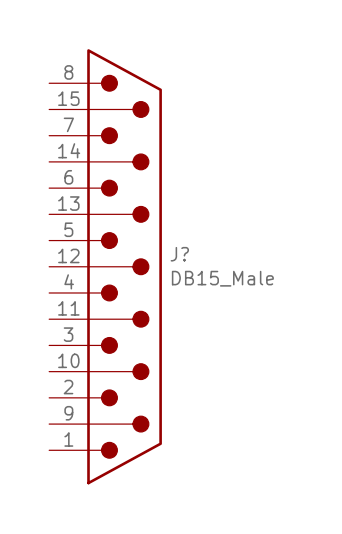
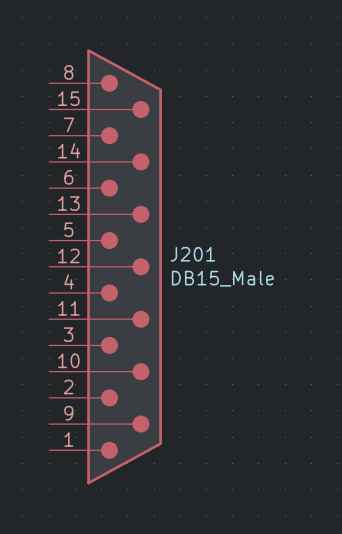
J? name: J? (179, 254) -> J201 (192, 254)

